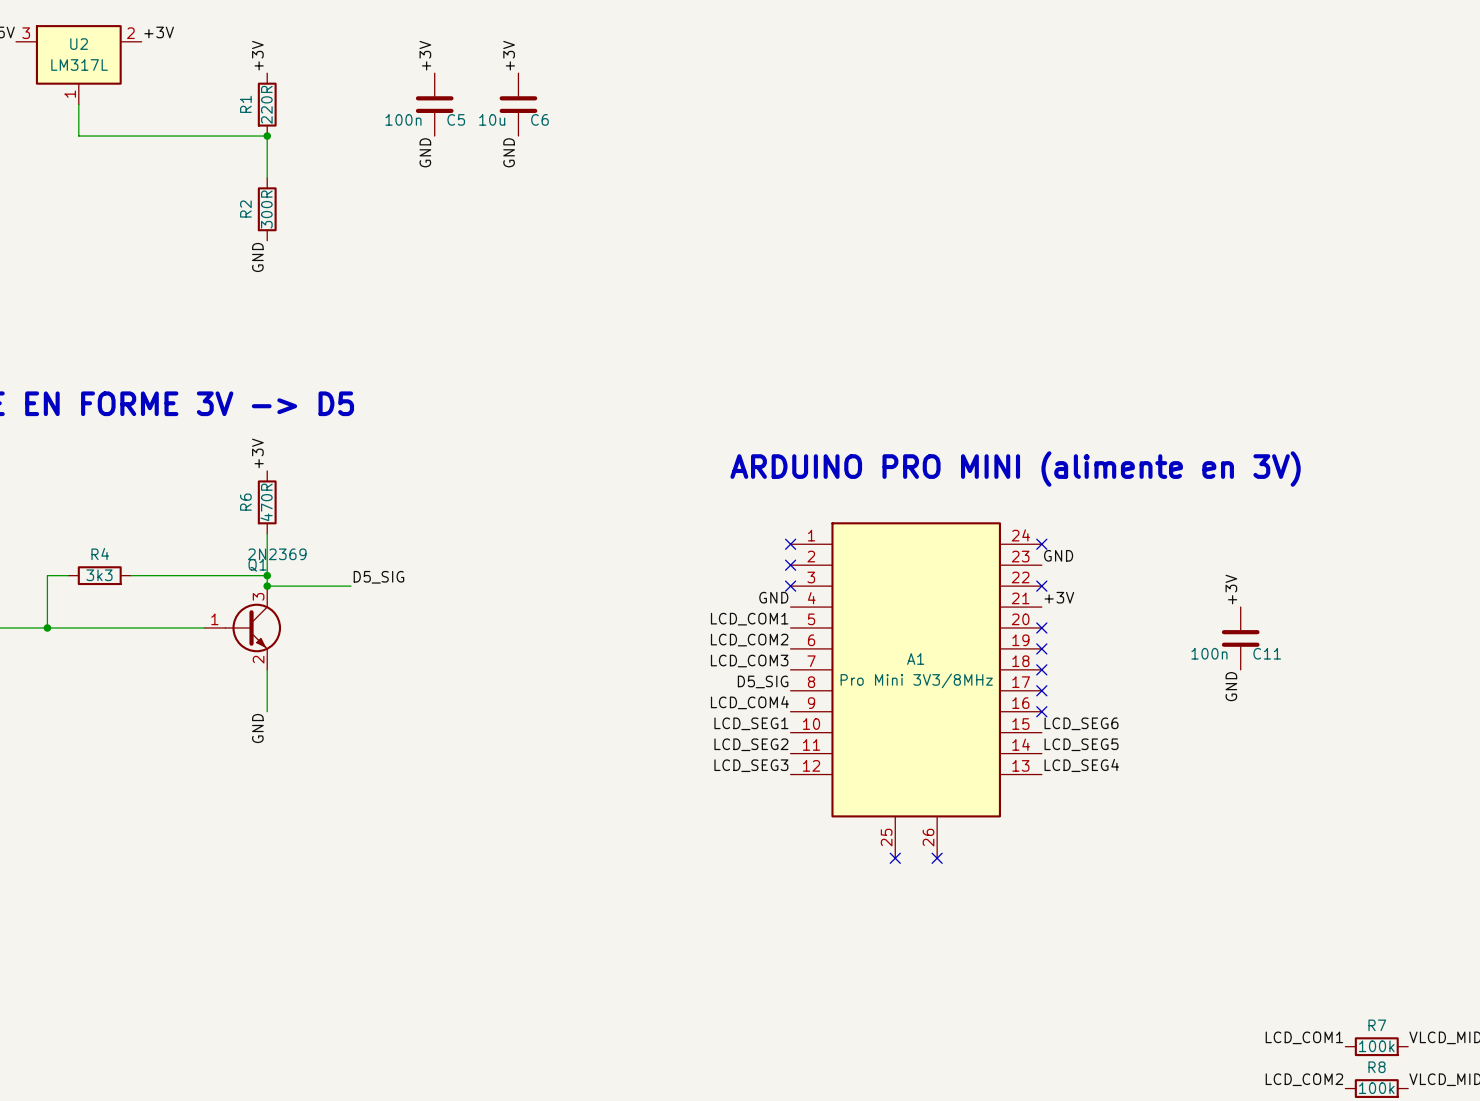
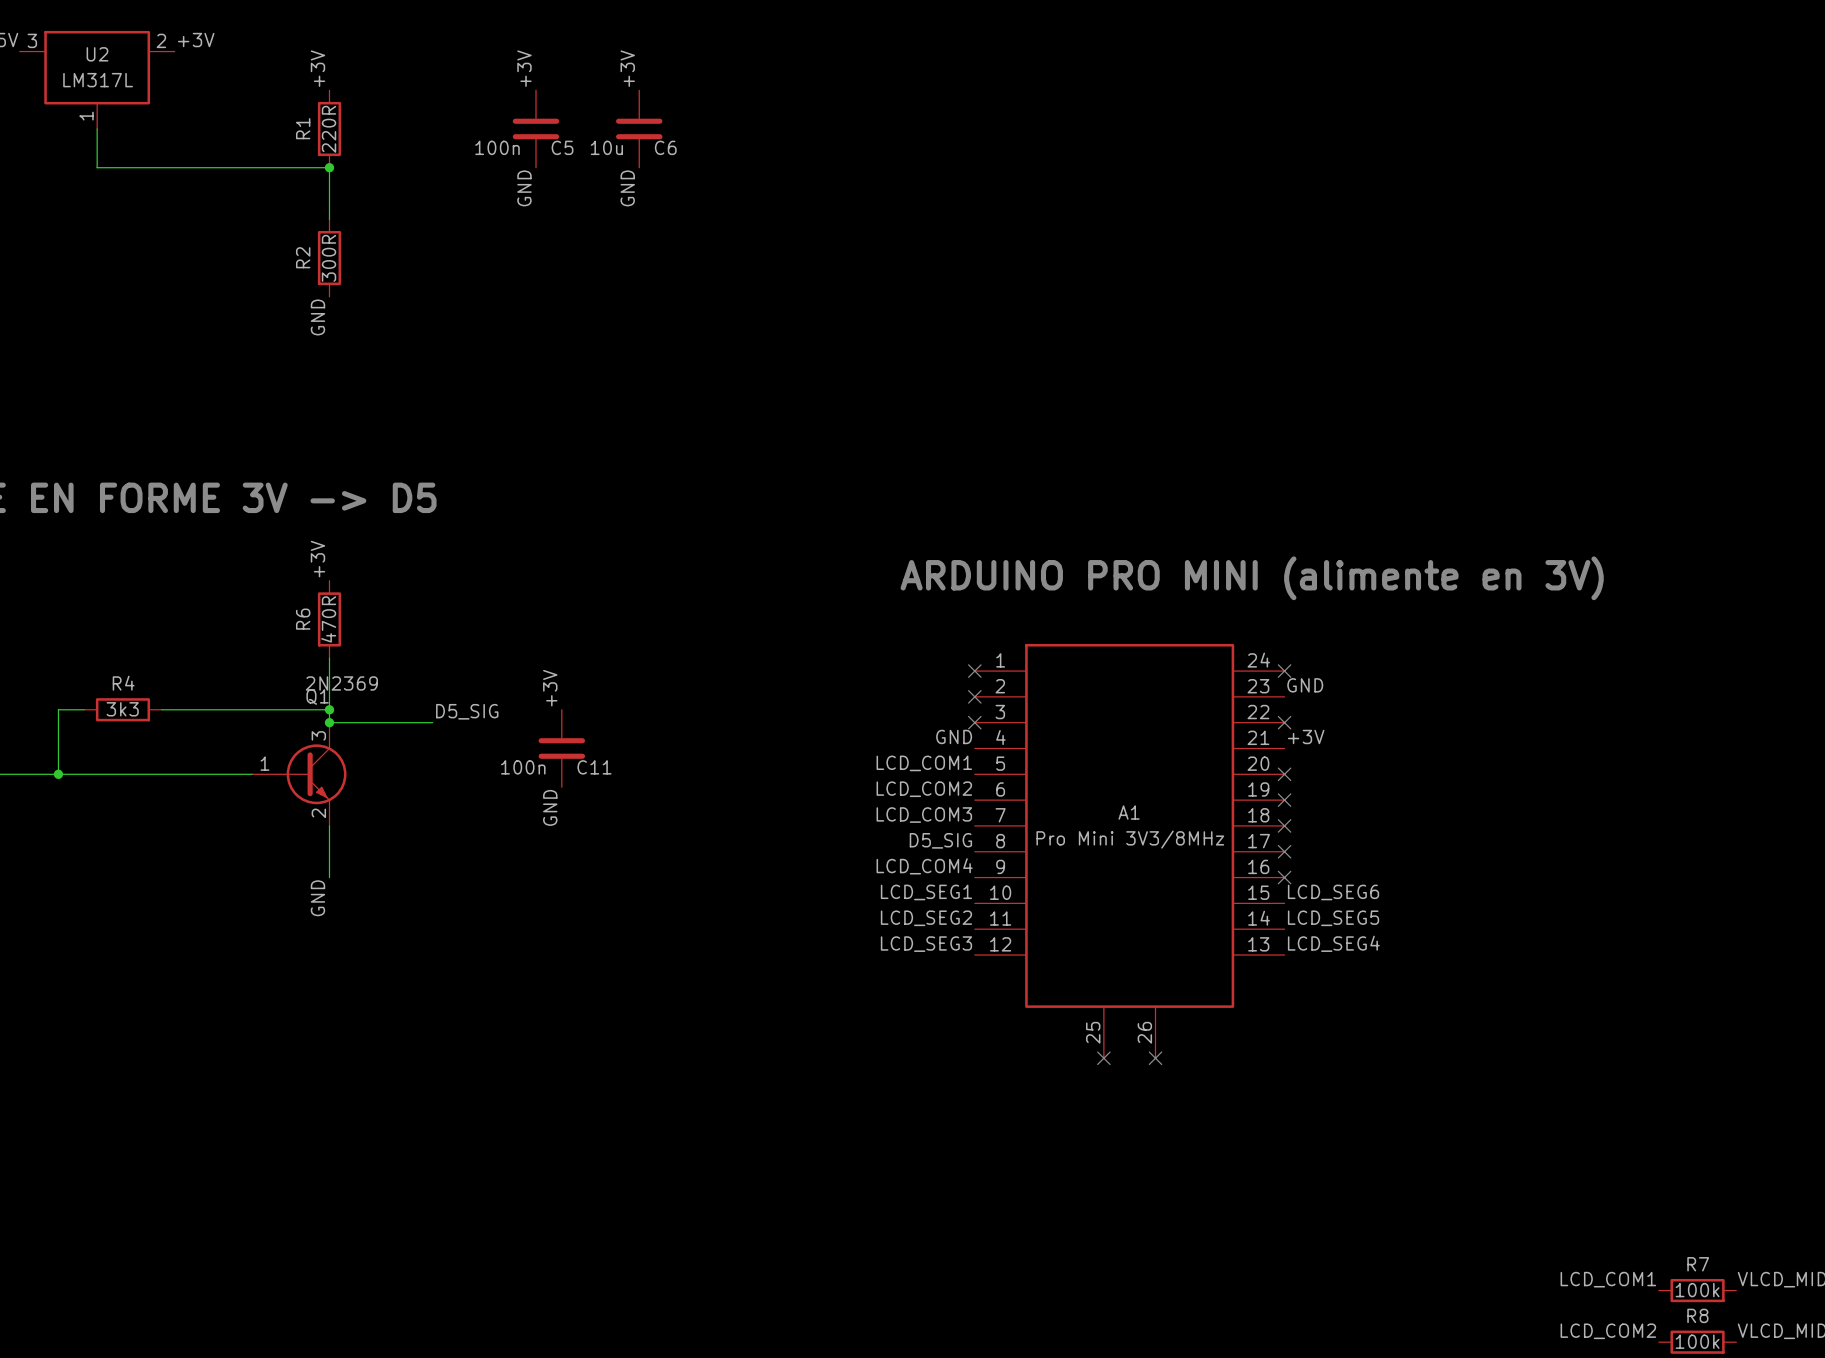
label: none -> +3V (550, 688)
label: +3V (1231, 589) -> none
C11 position: (1240, 638) -> (561, 748)
label: none -> GND (550, 807)
label: GND (1231, 686) -> none

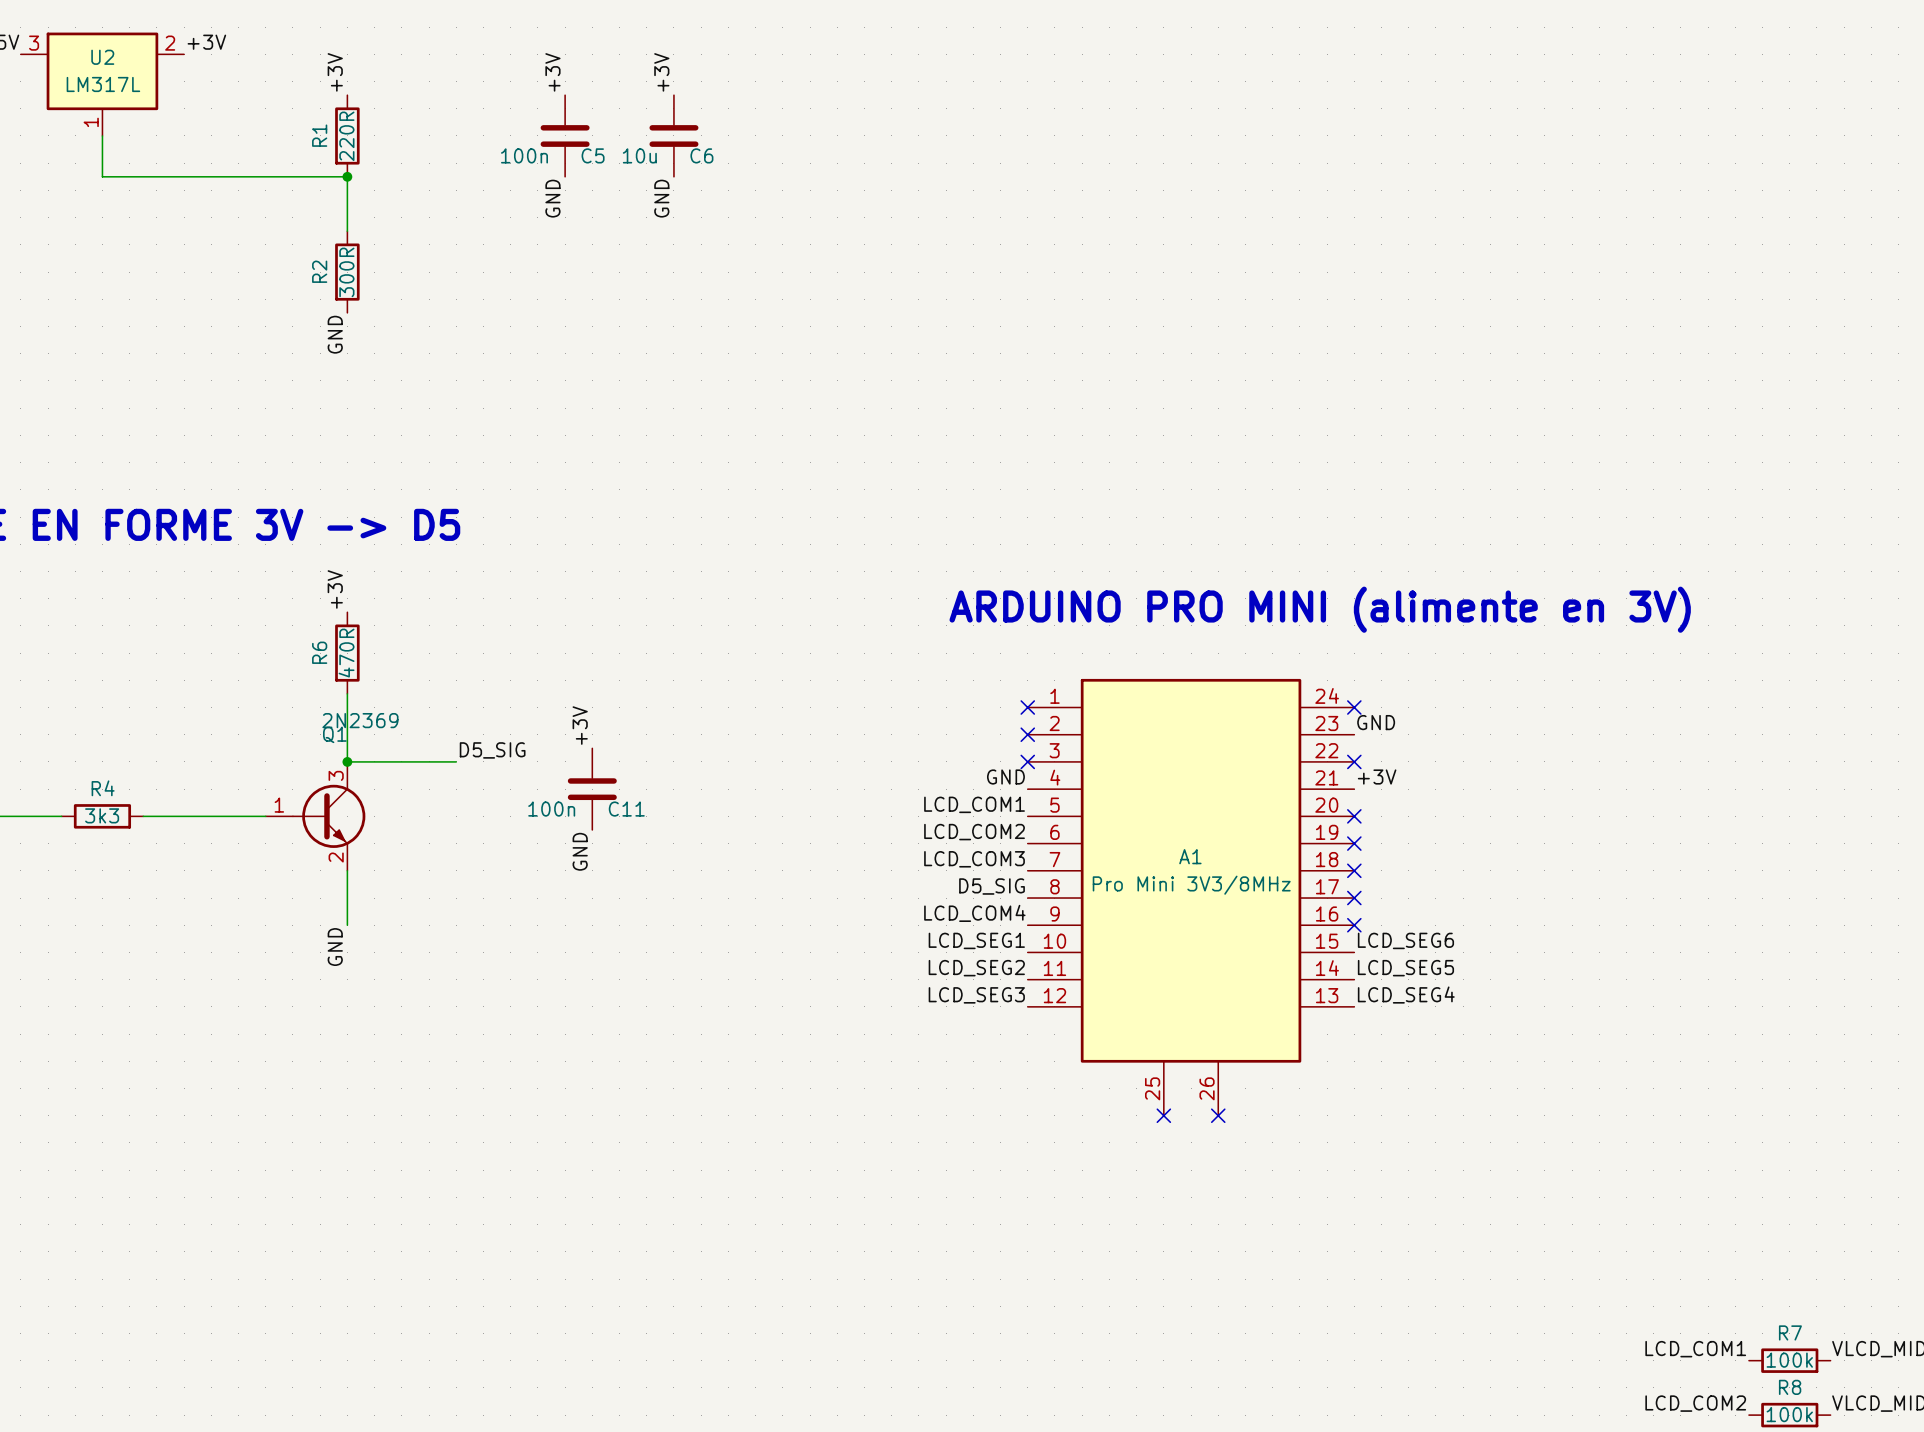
wire: (84, 709) (58, 709) (58, 774) (135, 774) -> none
R4 position: (122, 709) -> (102, 816)
wire: (161, 709) (329, 709) -> none
junction: (329, 709) -> none
junction: (58, 774) -> none

